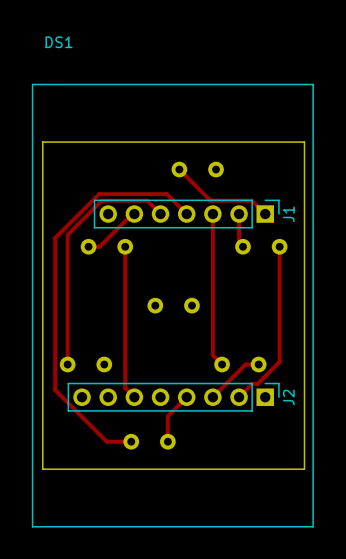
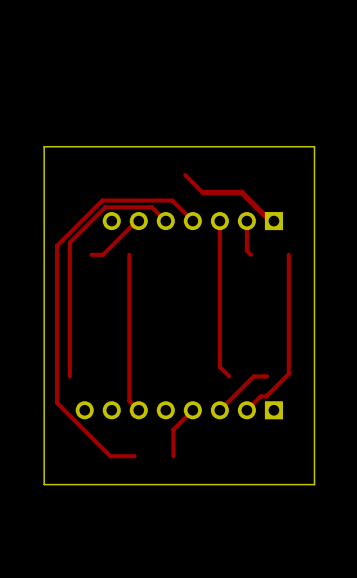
track: (196, 186) (210, 200) (251, 200) (265, 214) -> (202, 192) (241, 192) (270, 221) (273, 221)
J1 side: top (186, 214) -> bottom (192, 221)
DS1: (172, 305) -> none
J2 side: top (173, 397) -> bottom (179, 410)

